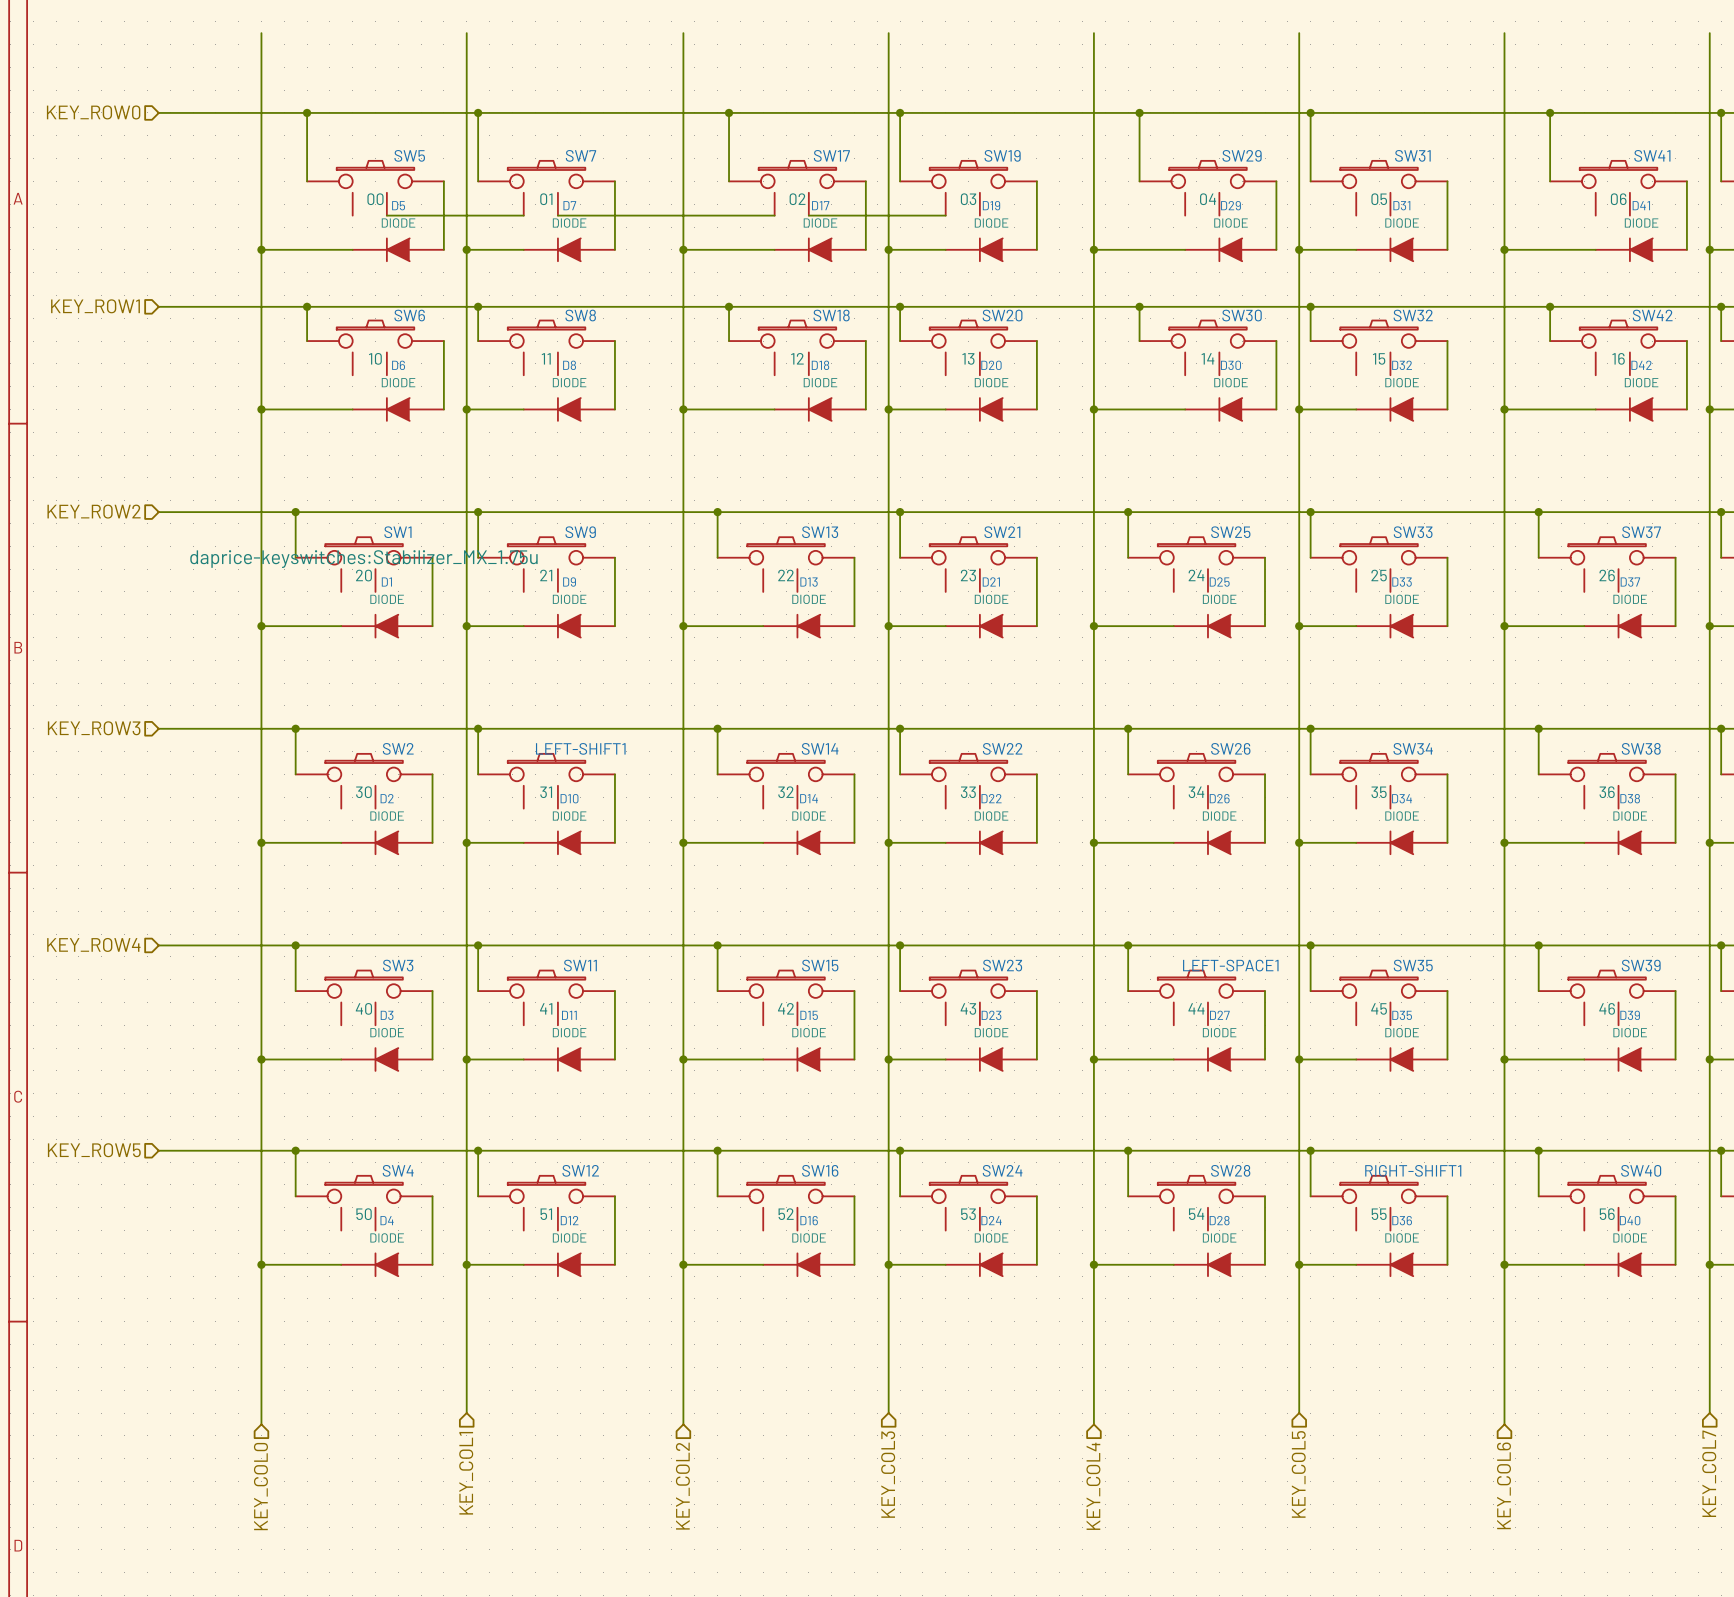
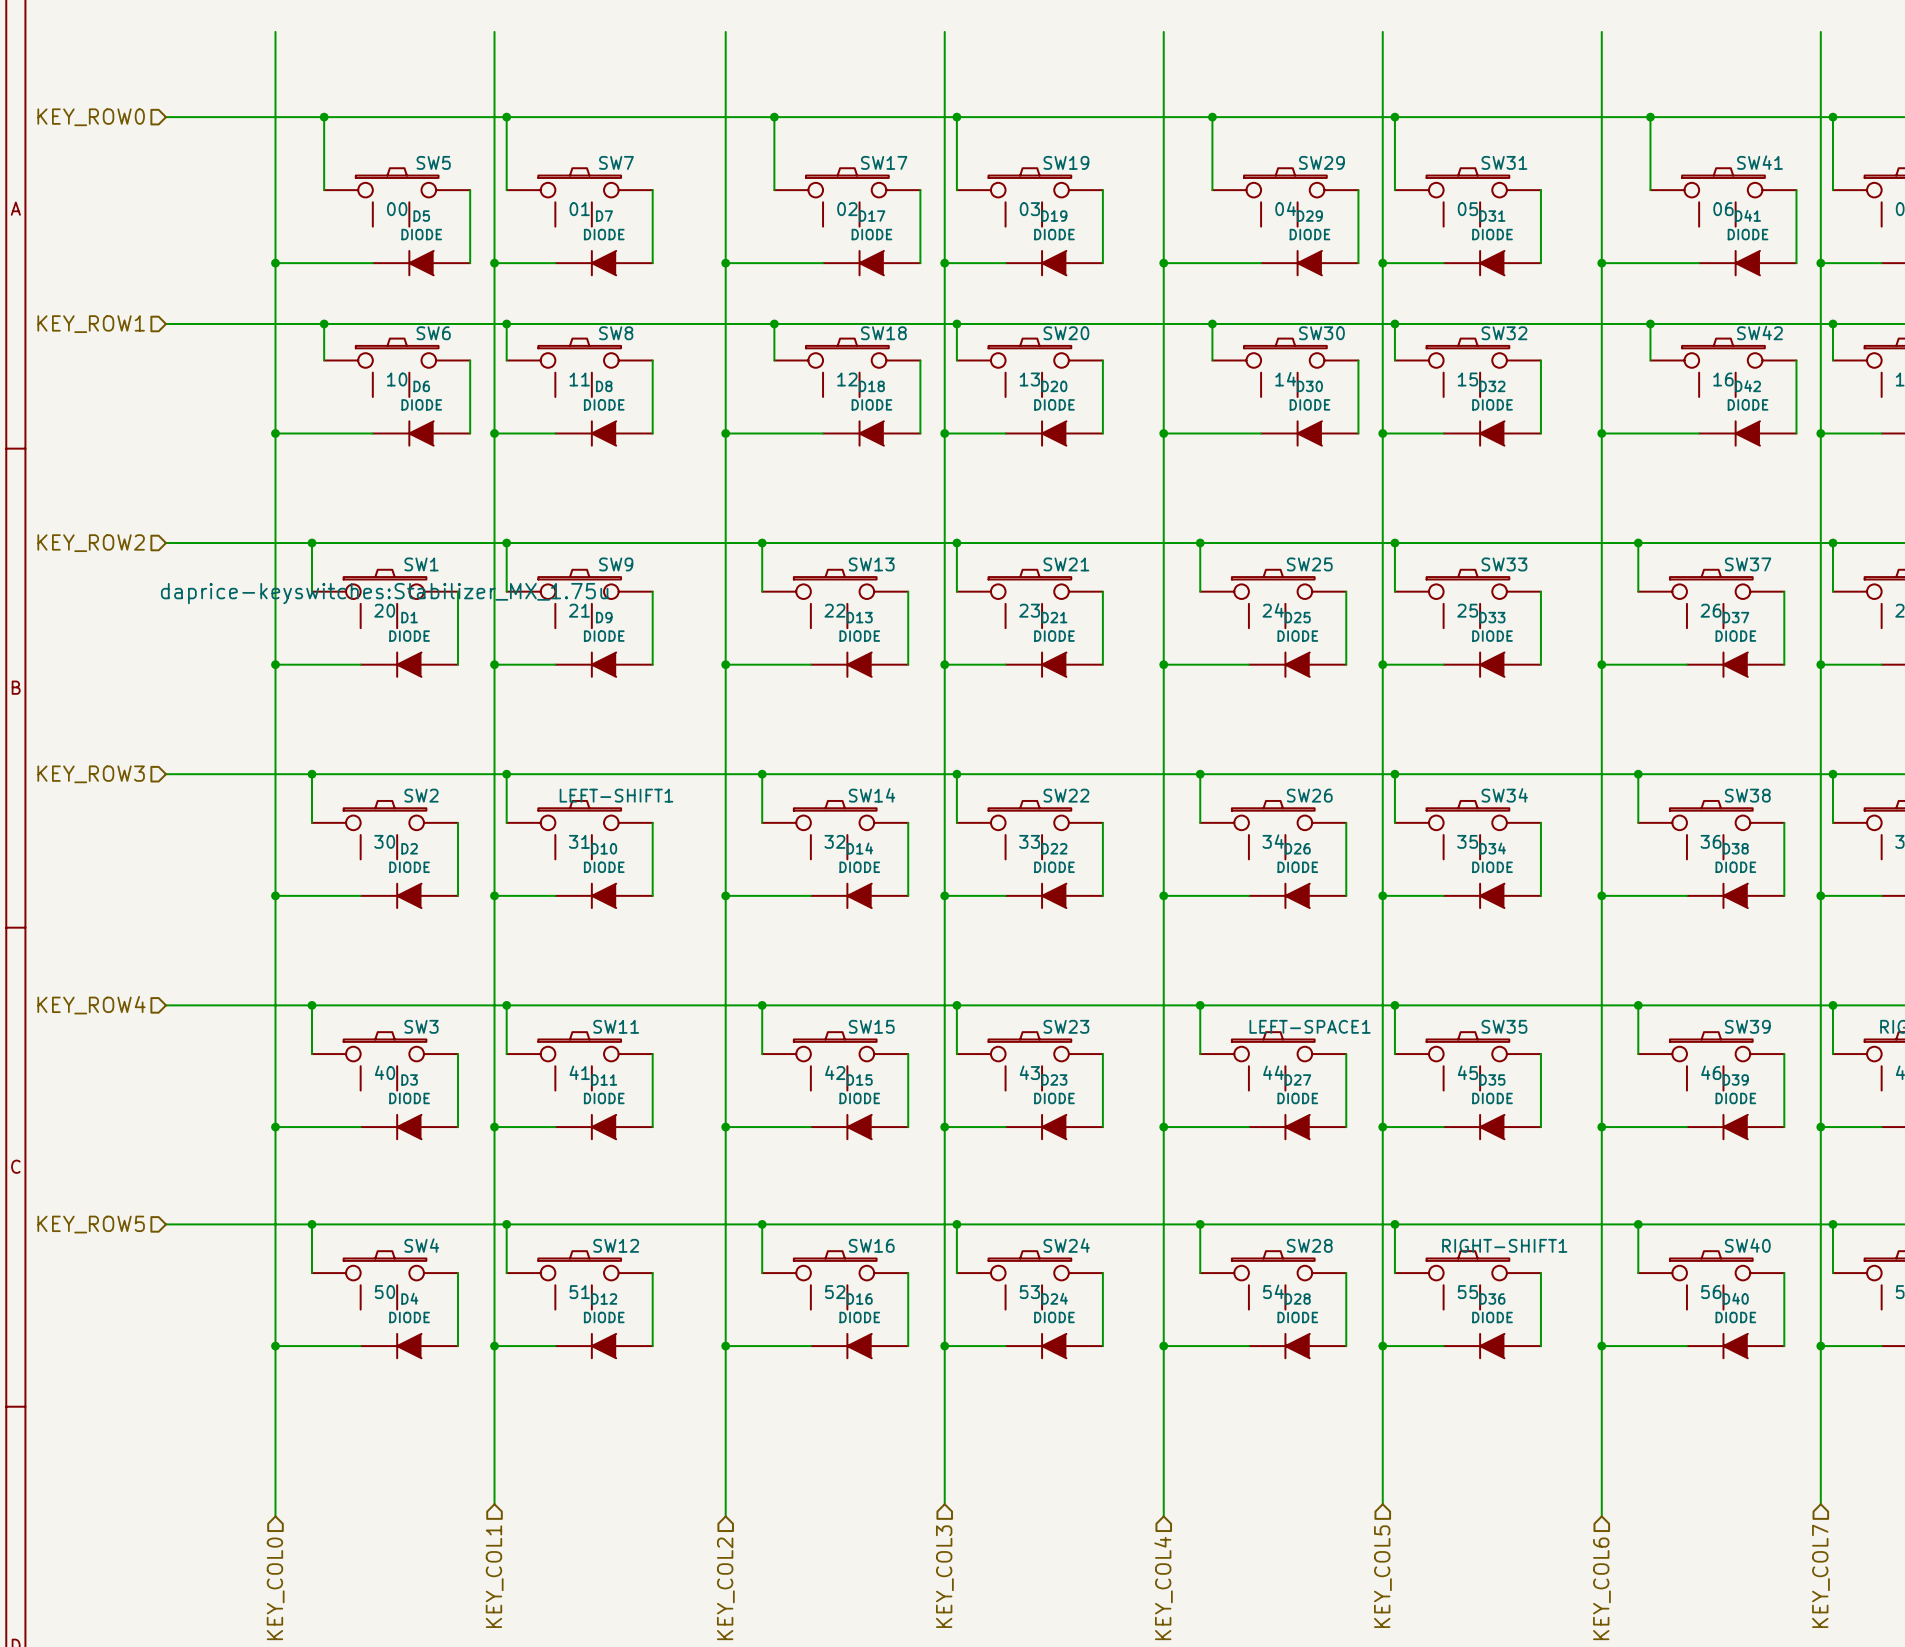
wire: (386, 215) (523, 215) -> none
wire: (557, 215) (774, 215) -> none
wire: (808, 215) (945, 215) -> none

